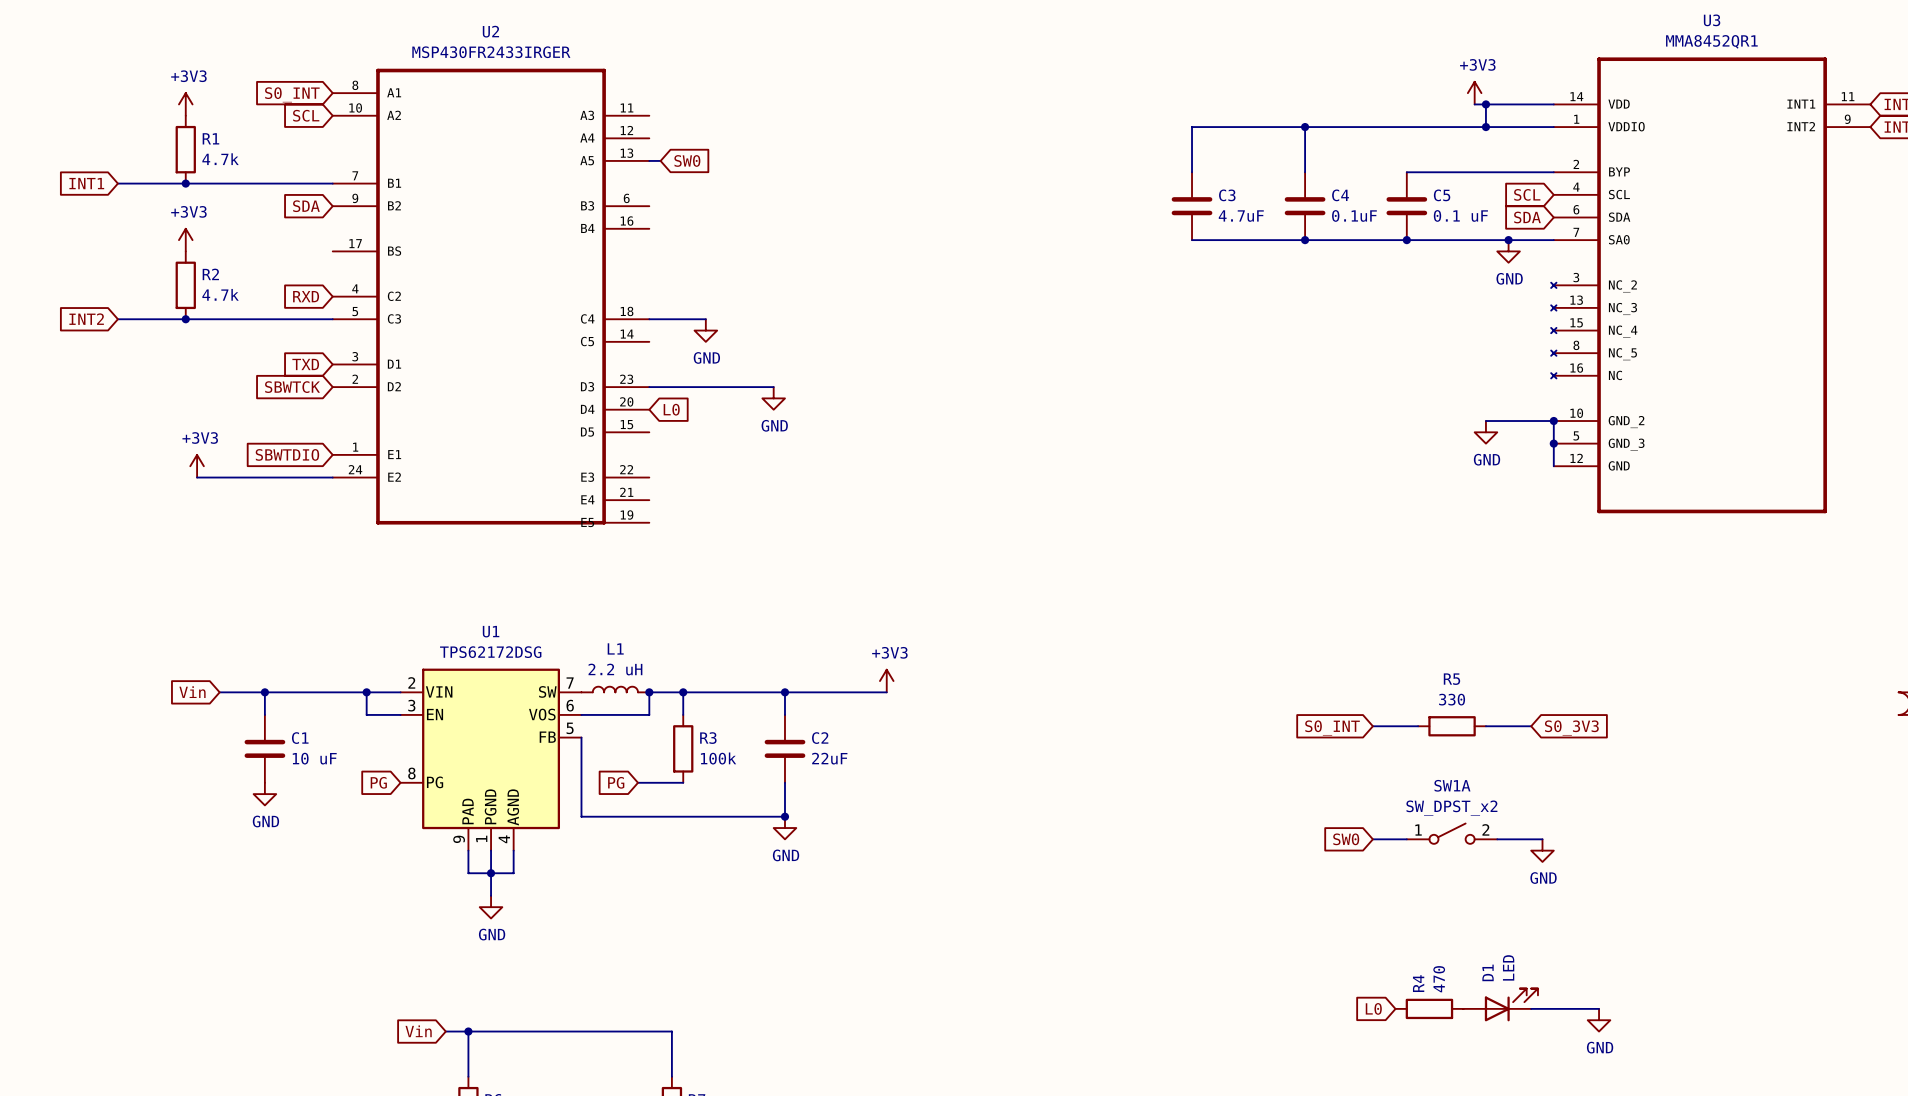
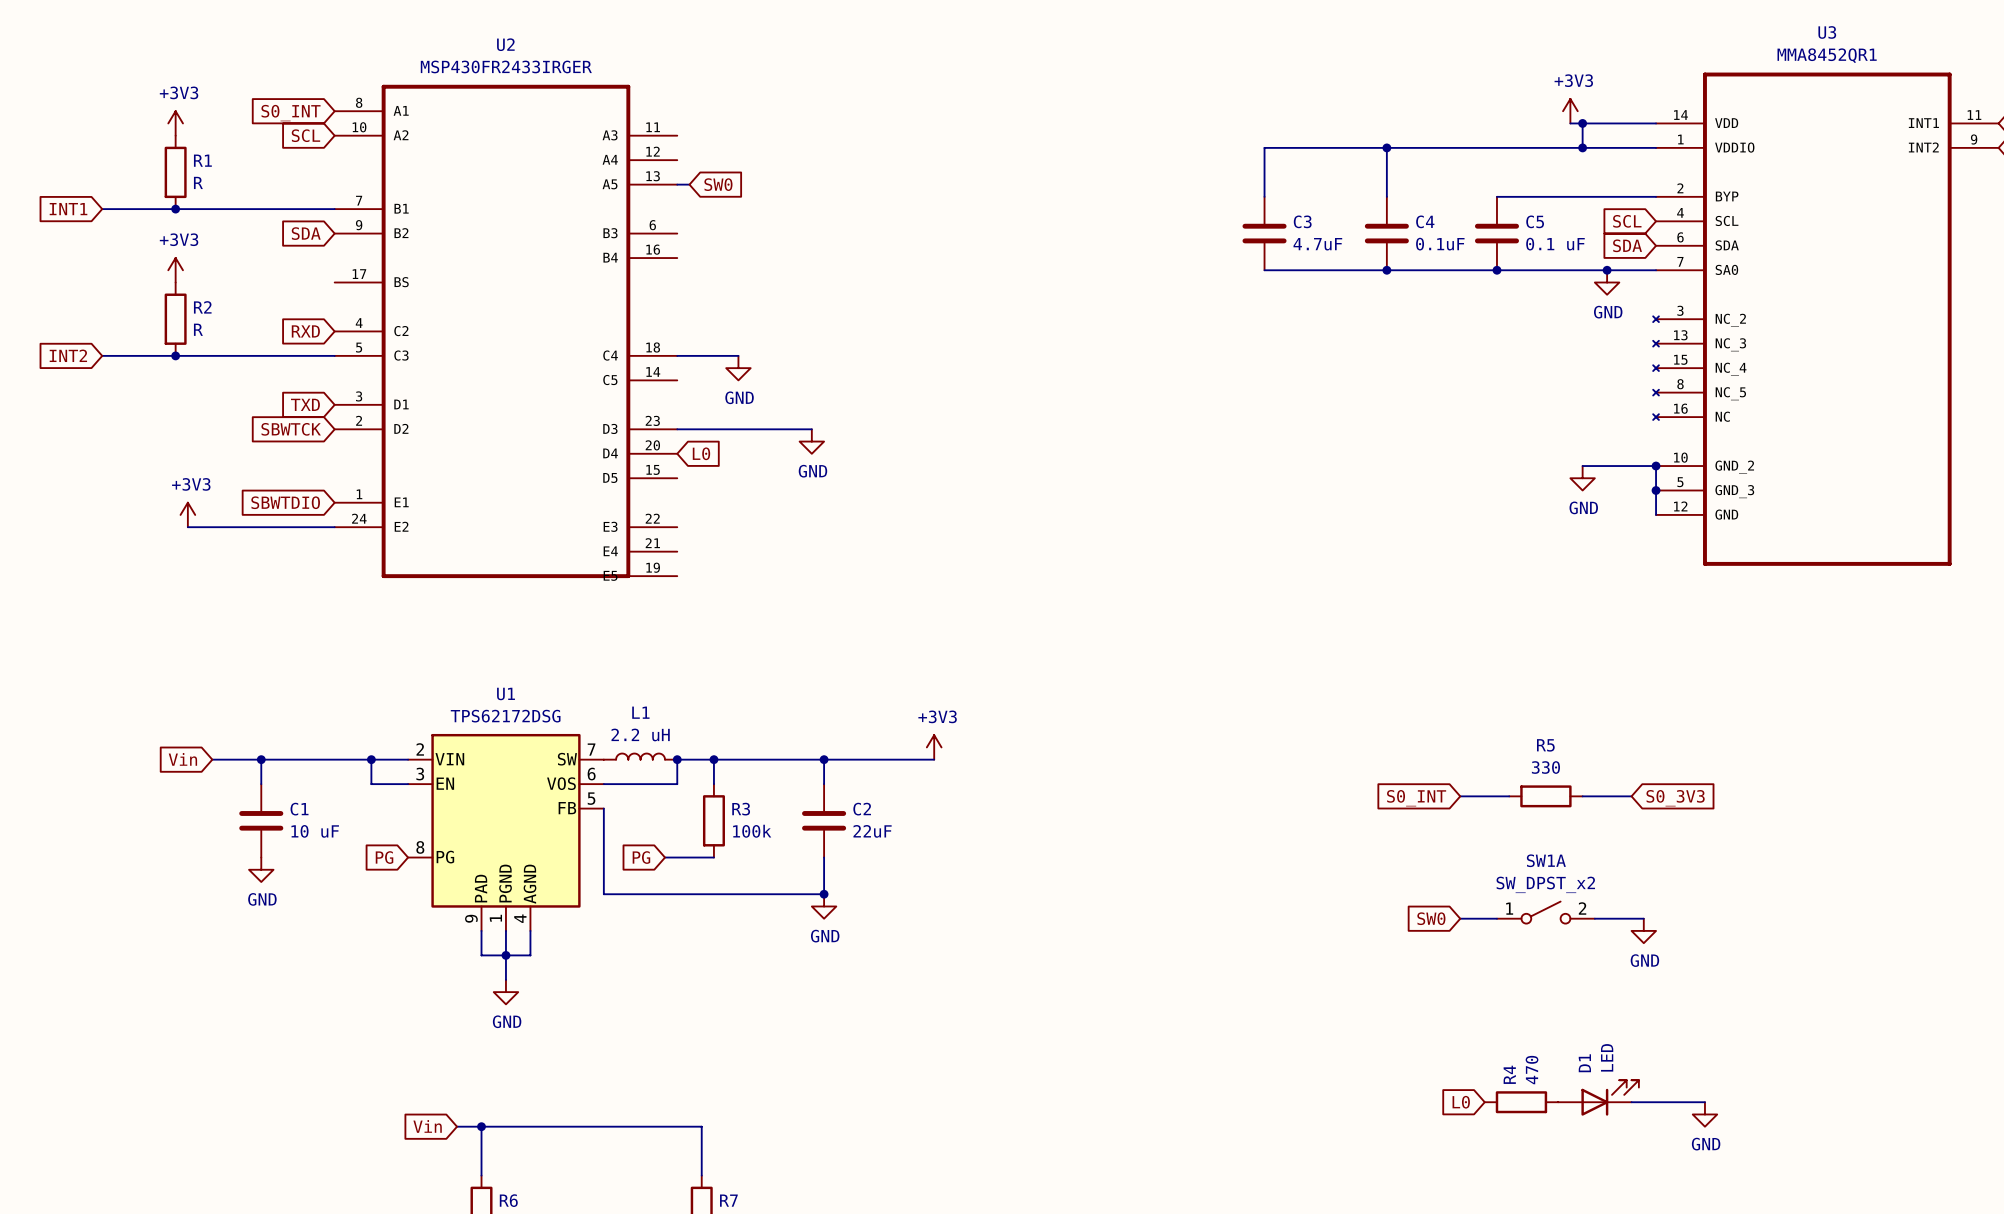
R1 value: 4.7k (220, 159) -> R (198, 182)
R2 value: 4.7k (220, 294) -> R (198, 329)

